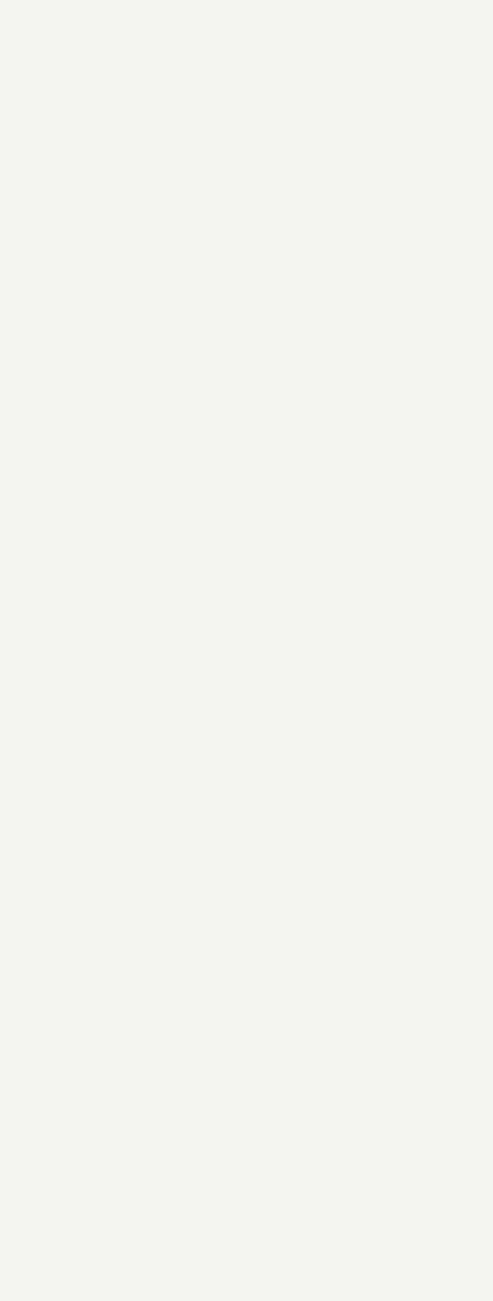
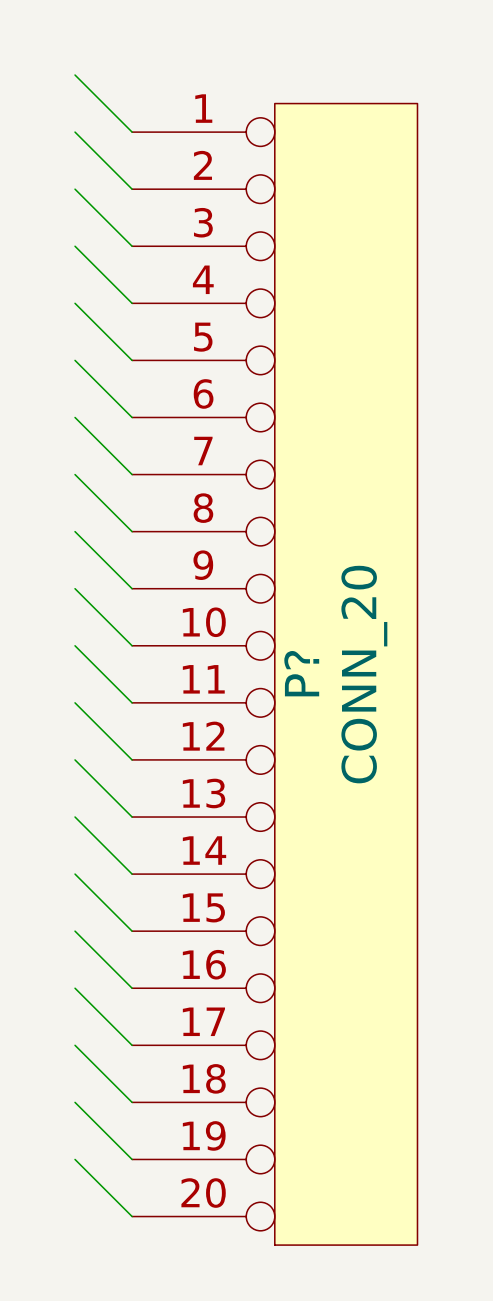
wire: none -> (75, 75) (132, 132)
wire: none -> (75, 132) (132, 189)
wire: none -> (75, 189) (132, 246)
wire: none -> (75, 246) (132, 303)
wire: none -> (75, 303) (132, 360)
wire: none -> (75, 360) (132, 417)
wire: none -> (75, 417) (132, 474)
wire: none -> (75, 474) (132, 531)
wire: none -> (75, 531) (132, 588)
wire: none -> (75, 588) (132, 645)
wire: none -> (75, 645) (132, 702)
P?: none -> CONN_20 (274, 674)
wire: none -> (75, 702) (132, 759)
wire: none -> (75, 759) (132, 817)
wire: none -> (75, 817) (132, 874)
wire: none -> (75, 874) (132, 931)
wire: none -> (75, 931) (132, 988)
wire: none -> (75, 988) (132, 1045)
wire: none -> (75, 1045) (132, 1102)
wire: none -> (75, 1102) (132, 1159)
wire: none -> (75, 1159) (132, 1216)

